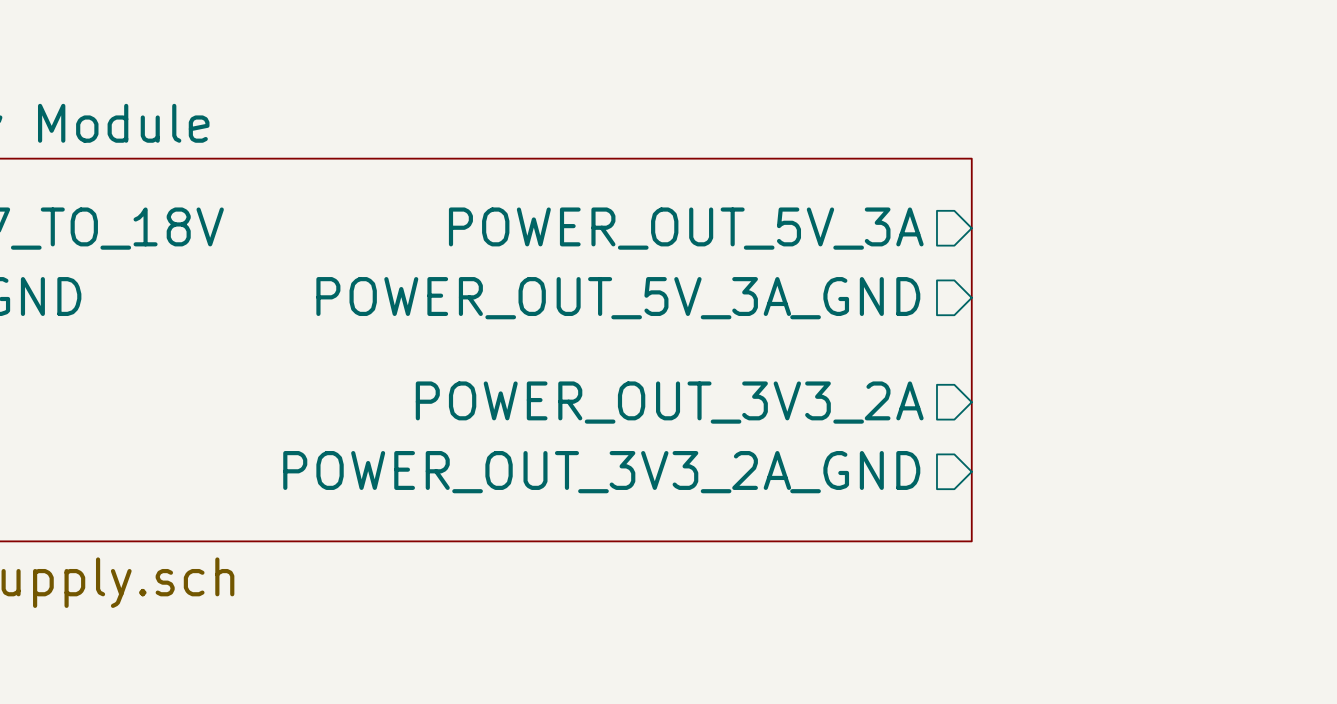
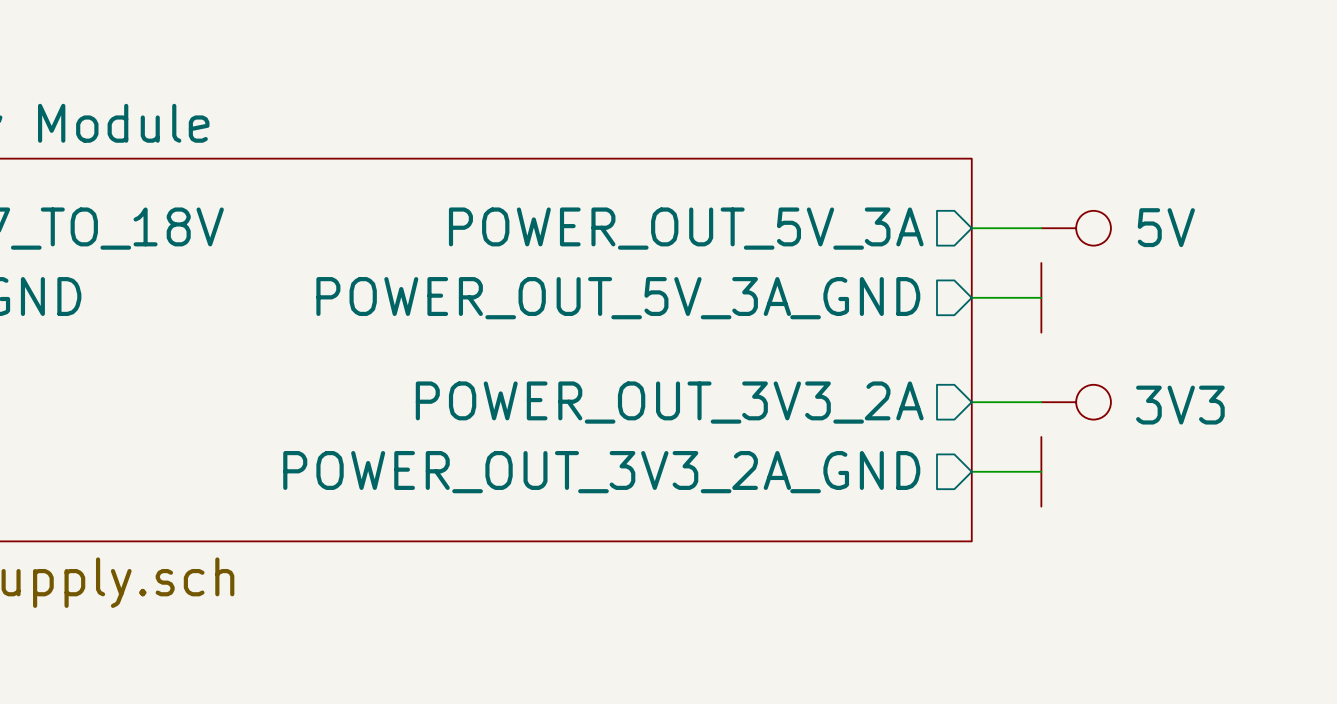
wire: none -> (971, 228) (1041, 228)
power symbol: none -> 5V (1076, 228)
wire: none -> (971, 297) (1041, 297)
power symbol: none -> (1041, 297)
wire: none -> (971, 402) (1041, 402)
power symbol: none -> 3V3 (1076, 402)
wire: none -> (971, 471) (1041, 471)
power symbol: none -> (1041, 471)

